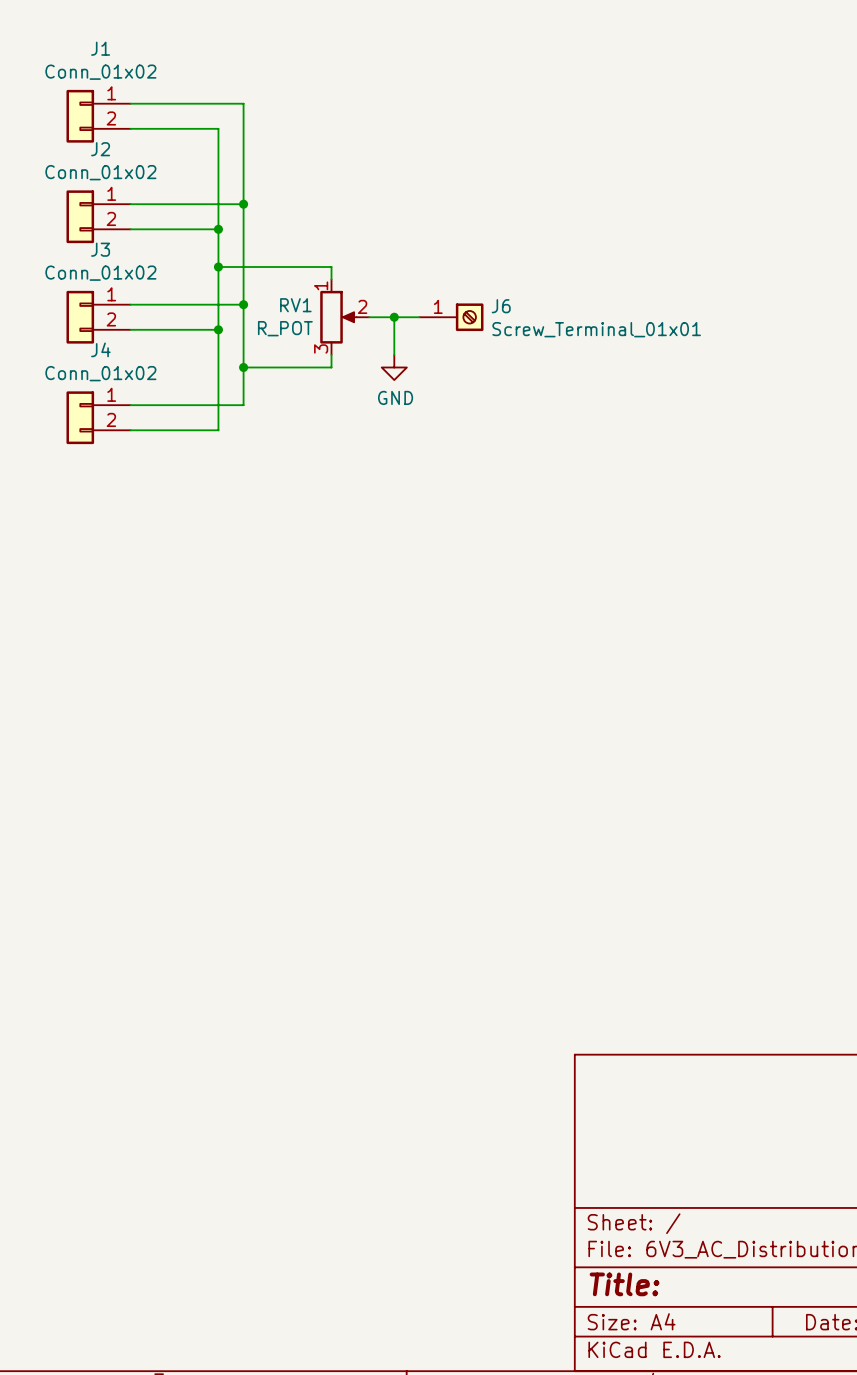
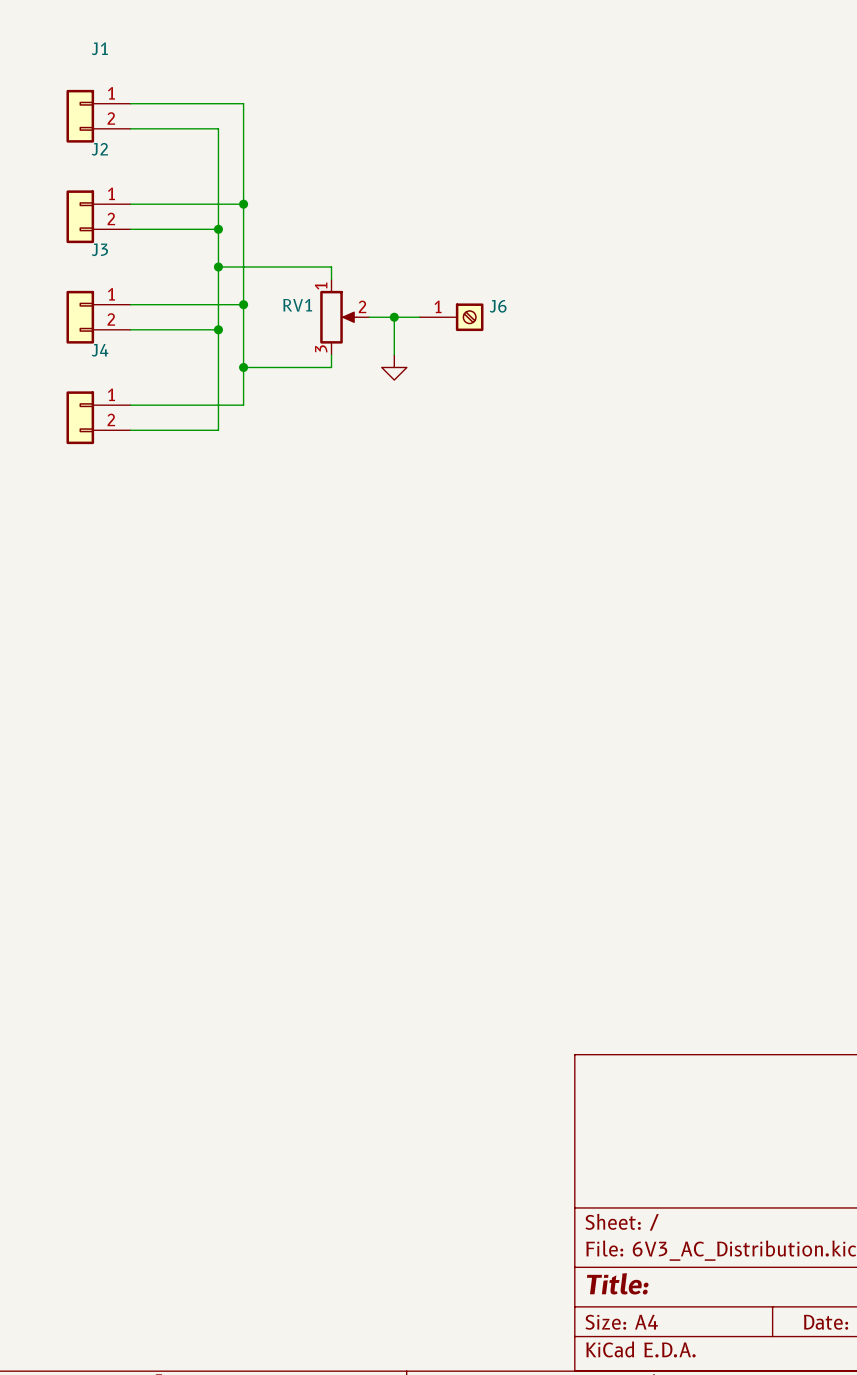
J1 value: Conn_01x02 (100, 72) -> none
J2 value: Conn_01x02 (100, 172) -> none
J3 value: Conn_01x02 (100, 273) -> none
RV1 value: R_POT (285, 328) -> none
J6 value: Screw_Terminal_01x01 (596, 329) -> none
J4 value: Conn_01x02 (100, 373) -> none
power symbol text: GND (395, 397) -> none

